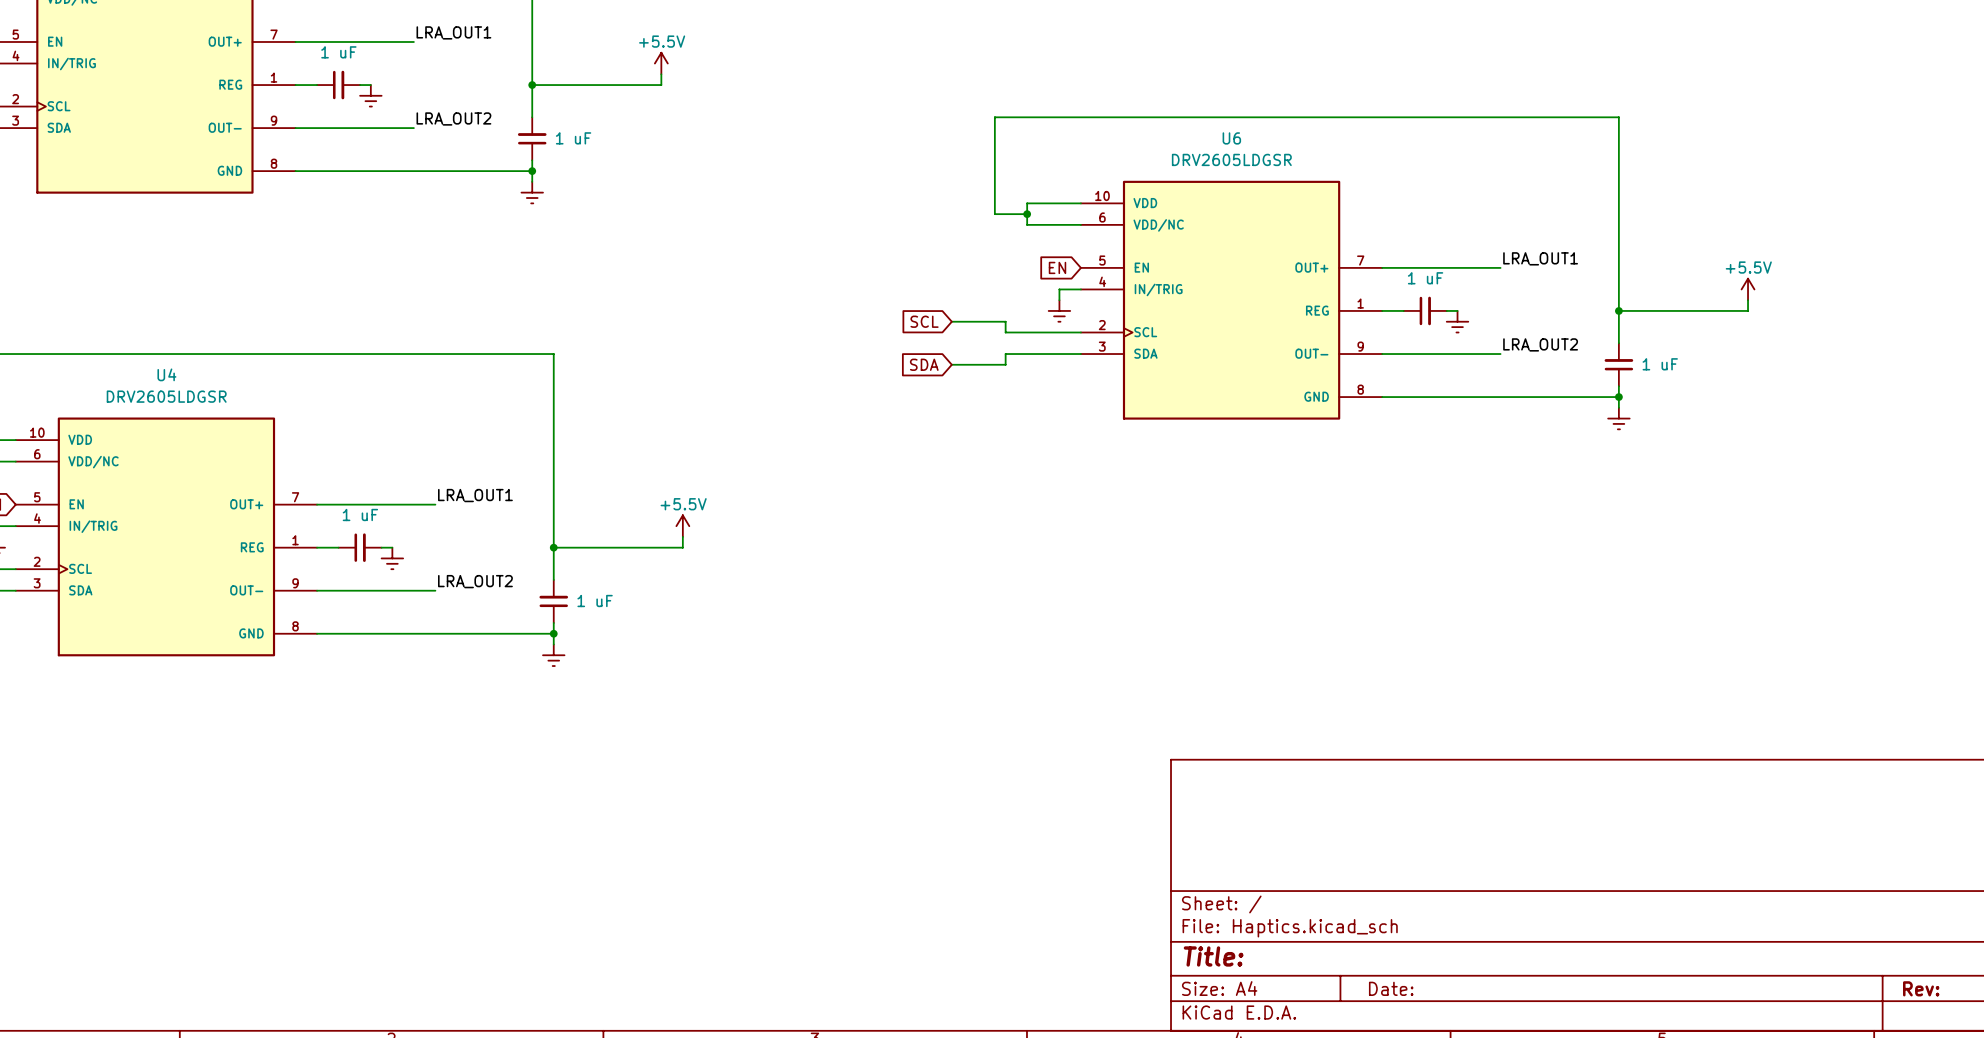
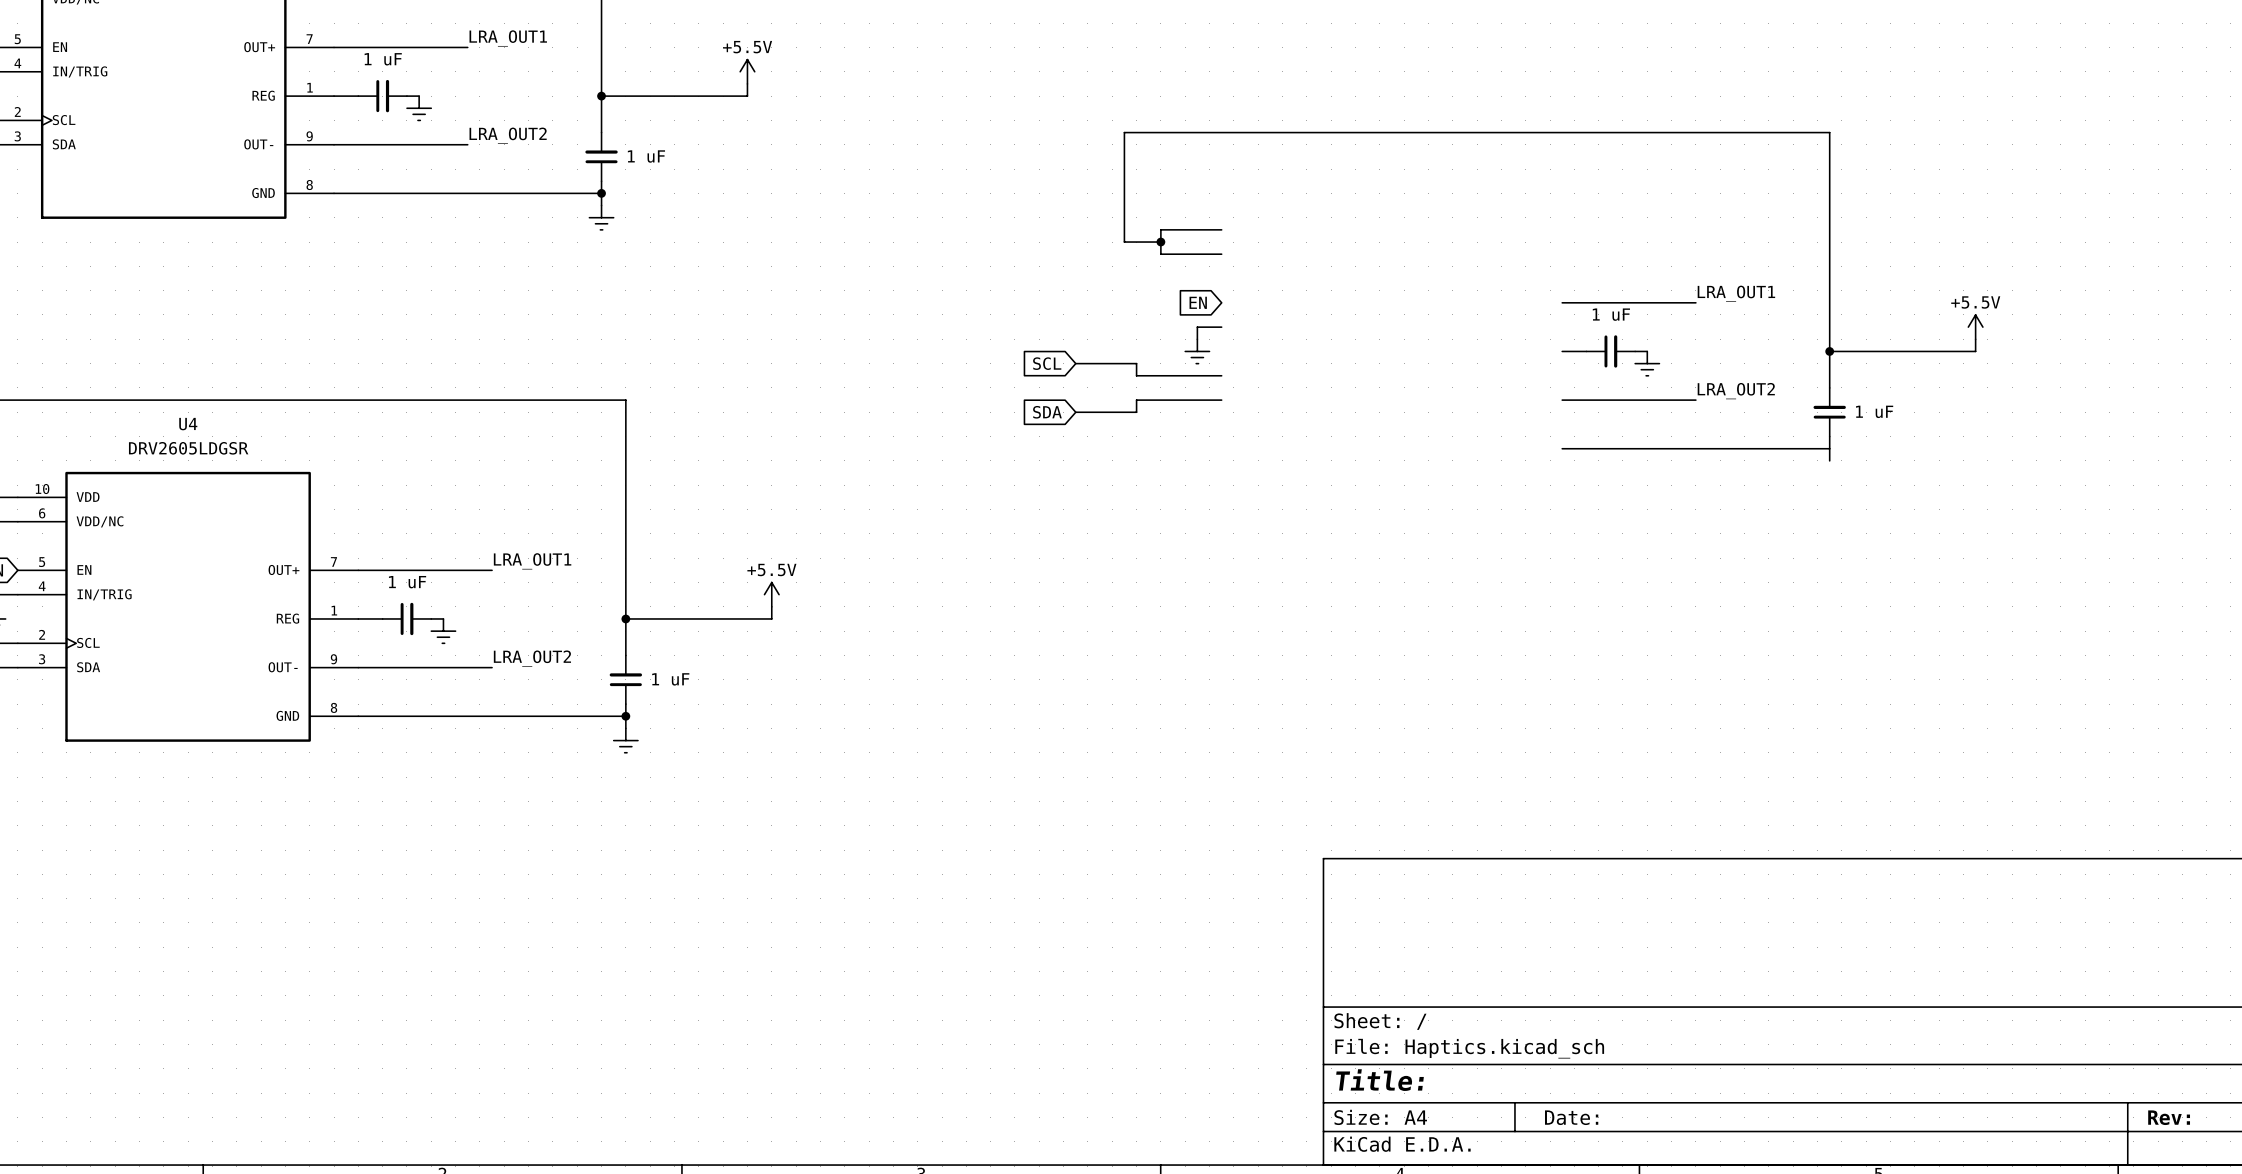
U6: DRV2605LDGSR (1231, 300) -> none
junction: (1618, 397) -> none
power symbol: (1618, 418) -> none

